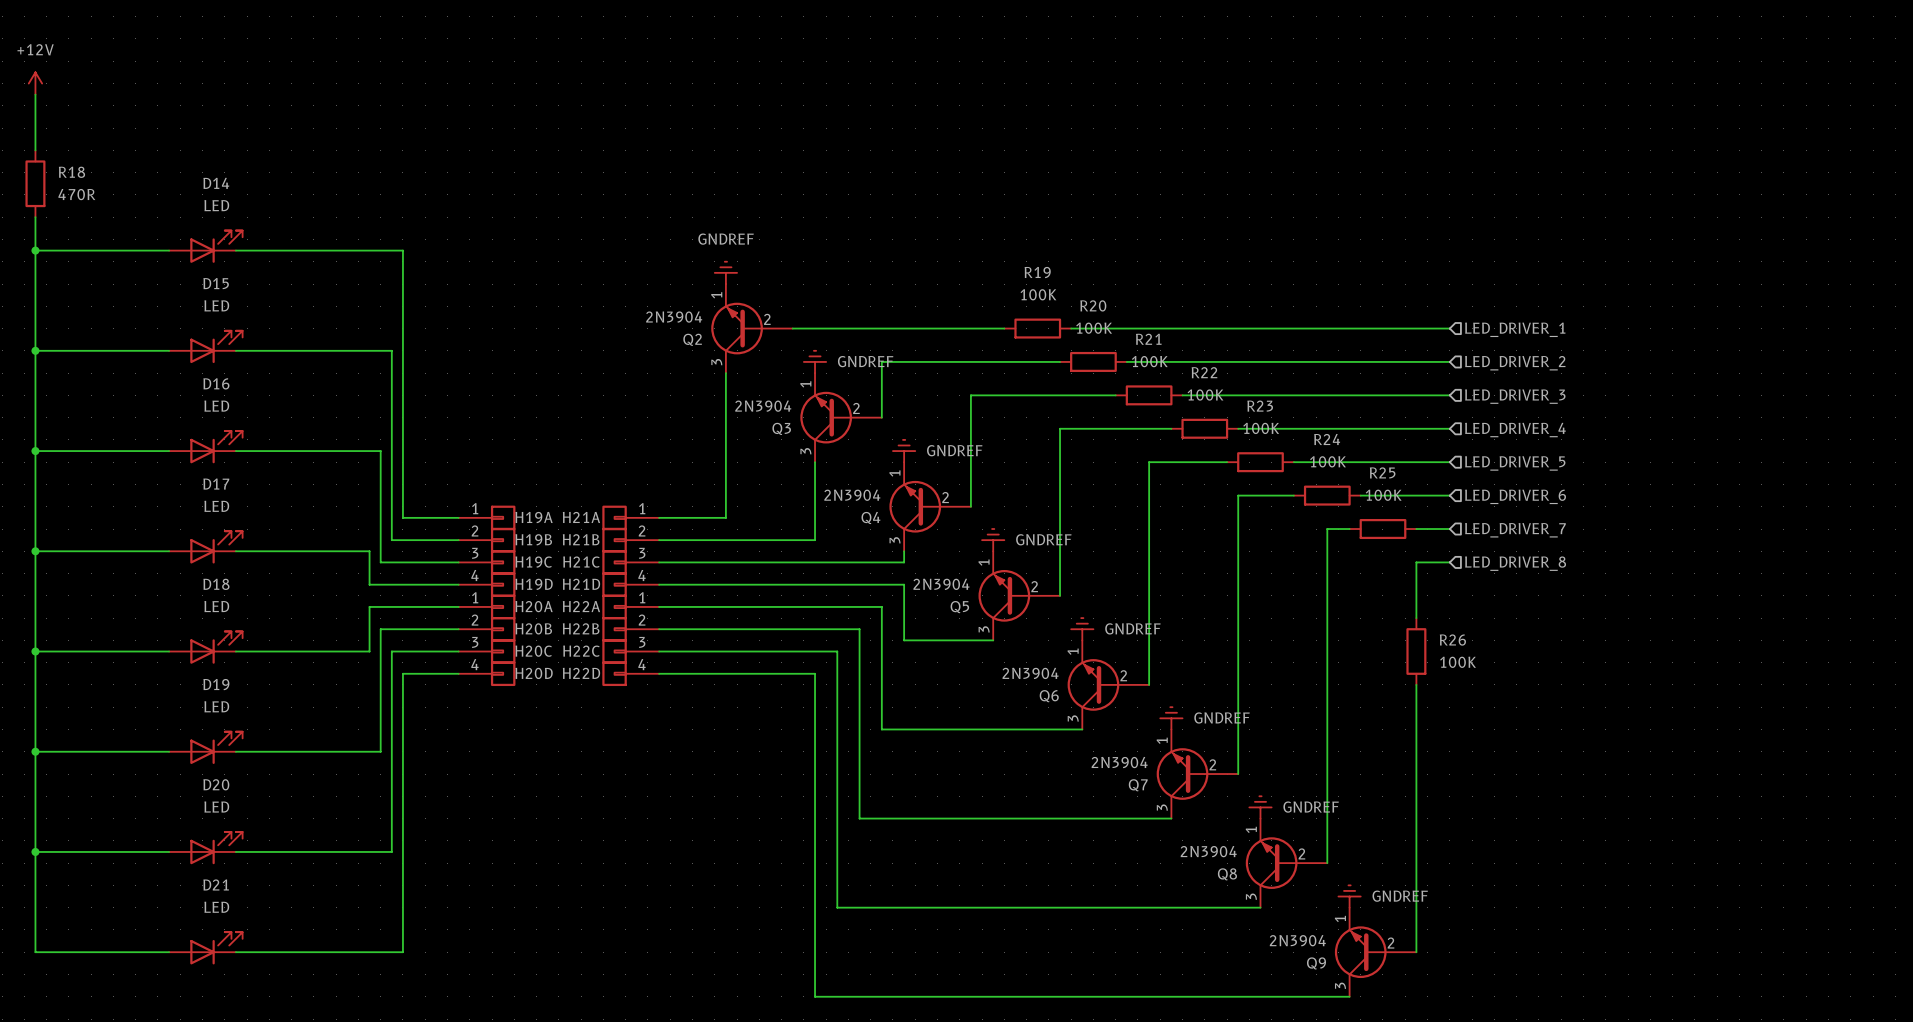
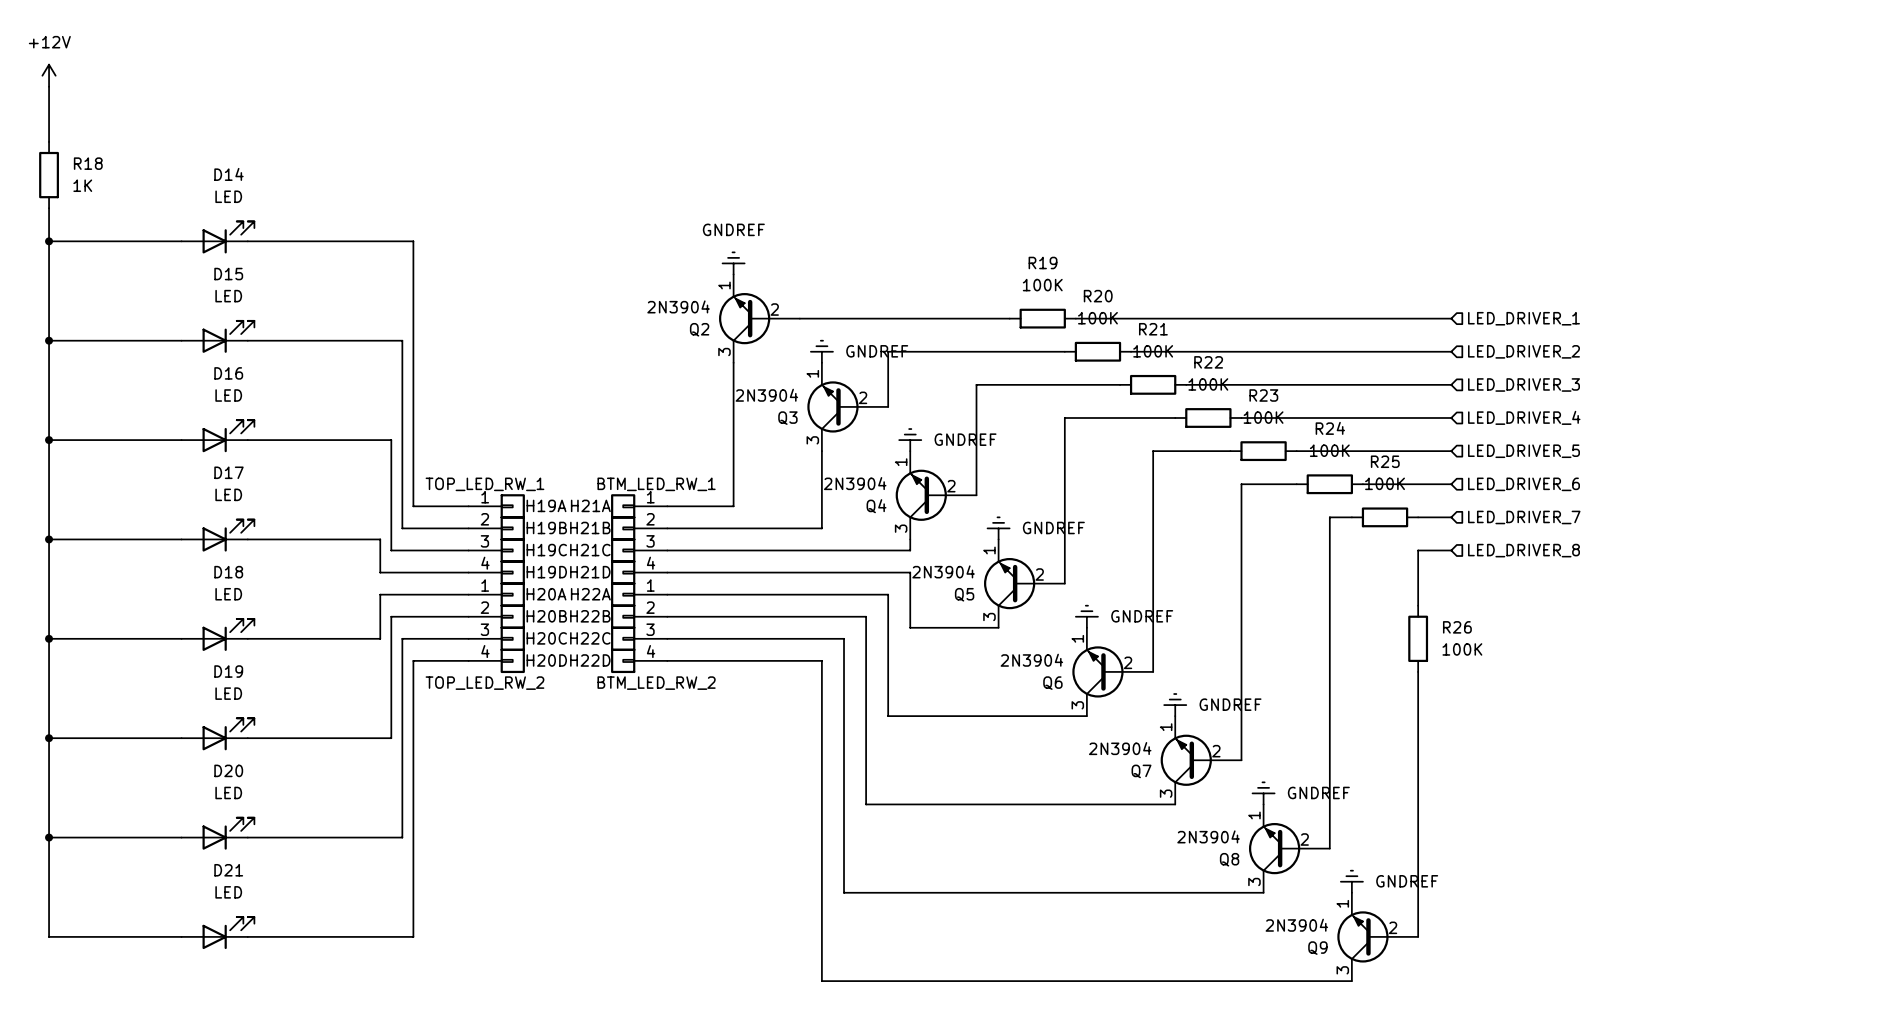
R18 value: 470R (76, 194) -> 1K (82, 185)
H19A value: none -> TOP_LED_RW_1 (484, 484)
H21A value: none -> BTM_LED_RW_1 (656, 484)
H20A value: none -> TOP_LED_RW_2 (484, 683)
H22A value: none -> BTM_LED_RW_2 (656, 683)

